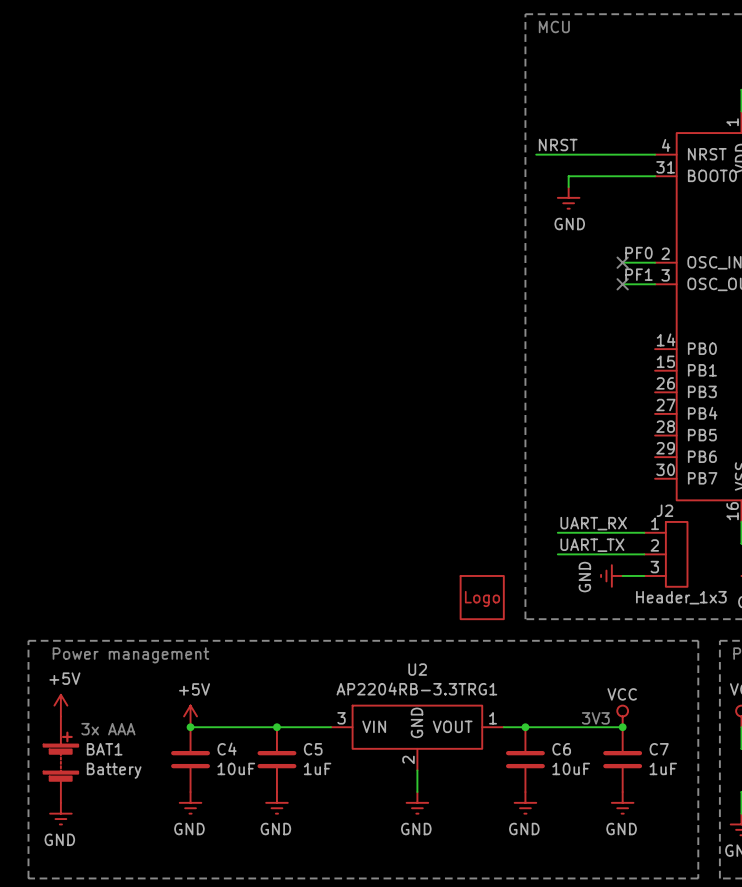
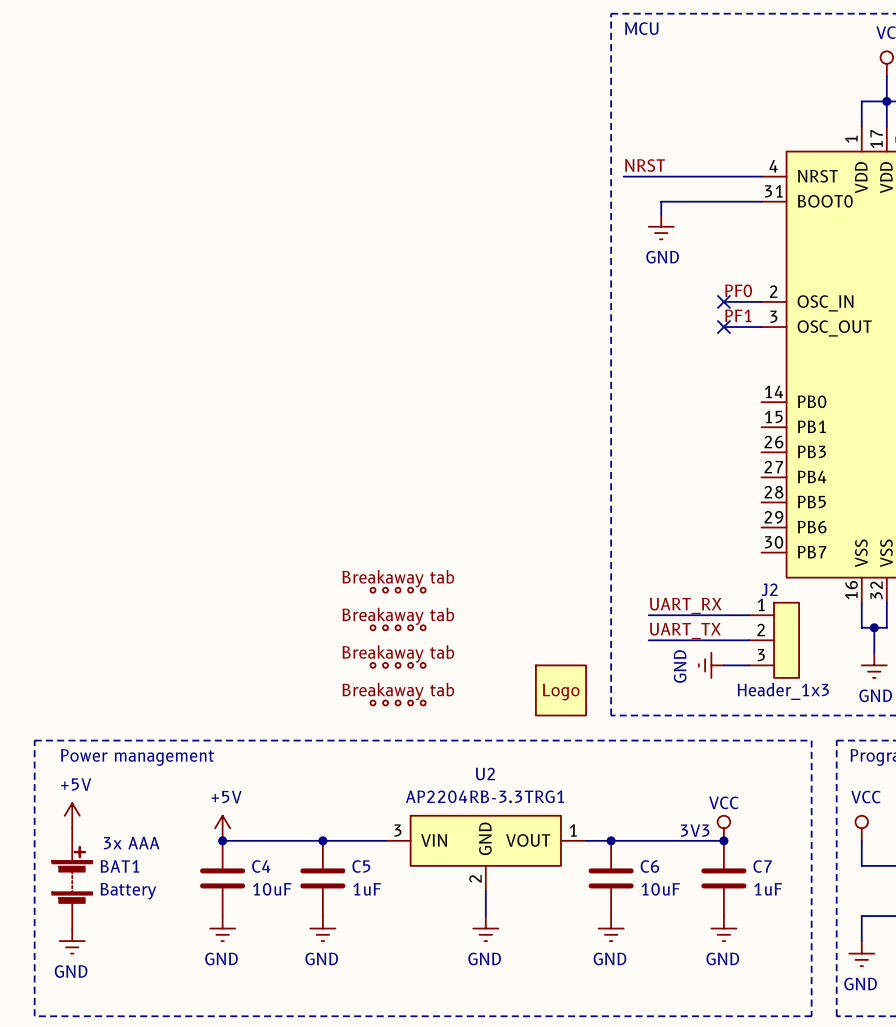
part: none -> (398, 590)
part: none -> (398, 627)
part: none -> (398, 665)
part: none -> (398, 702)

